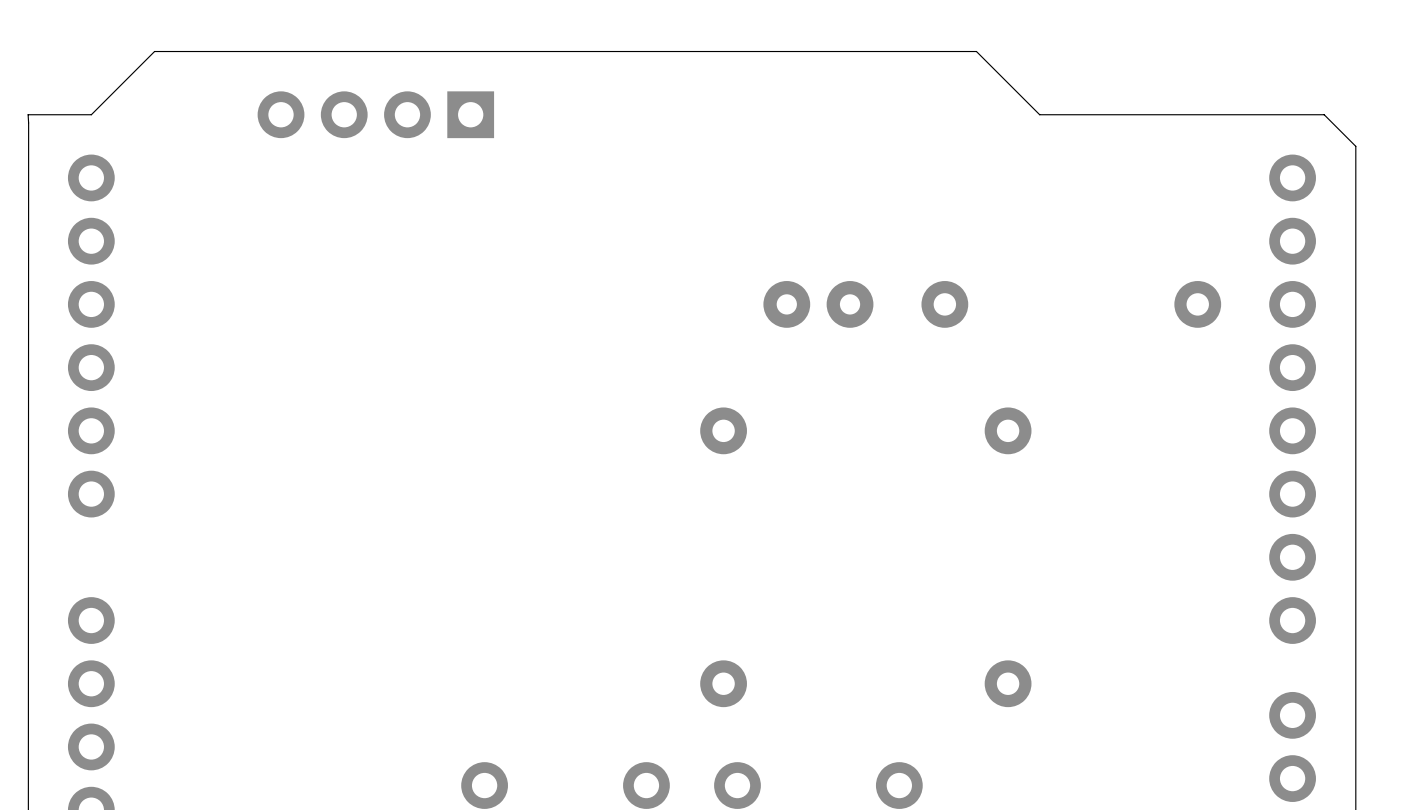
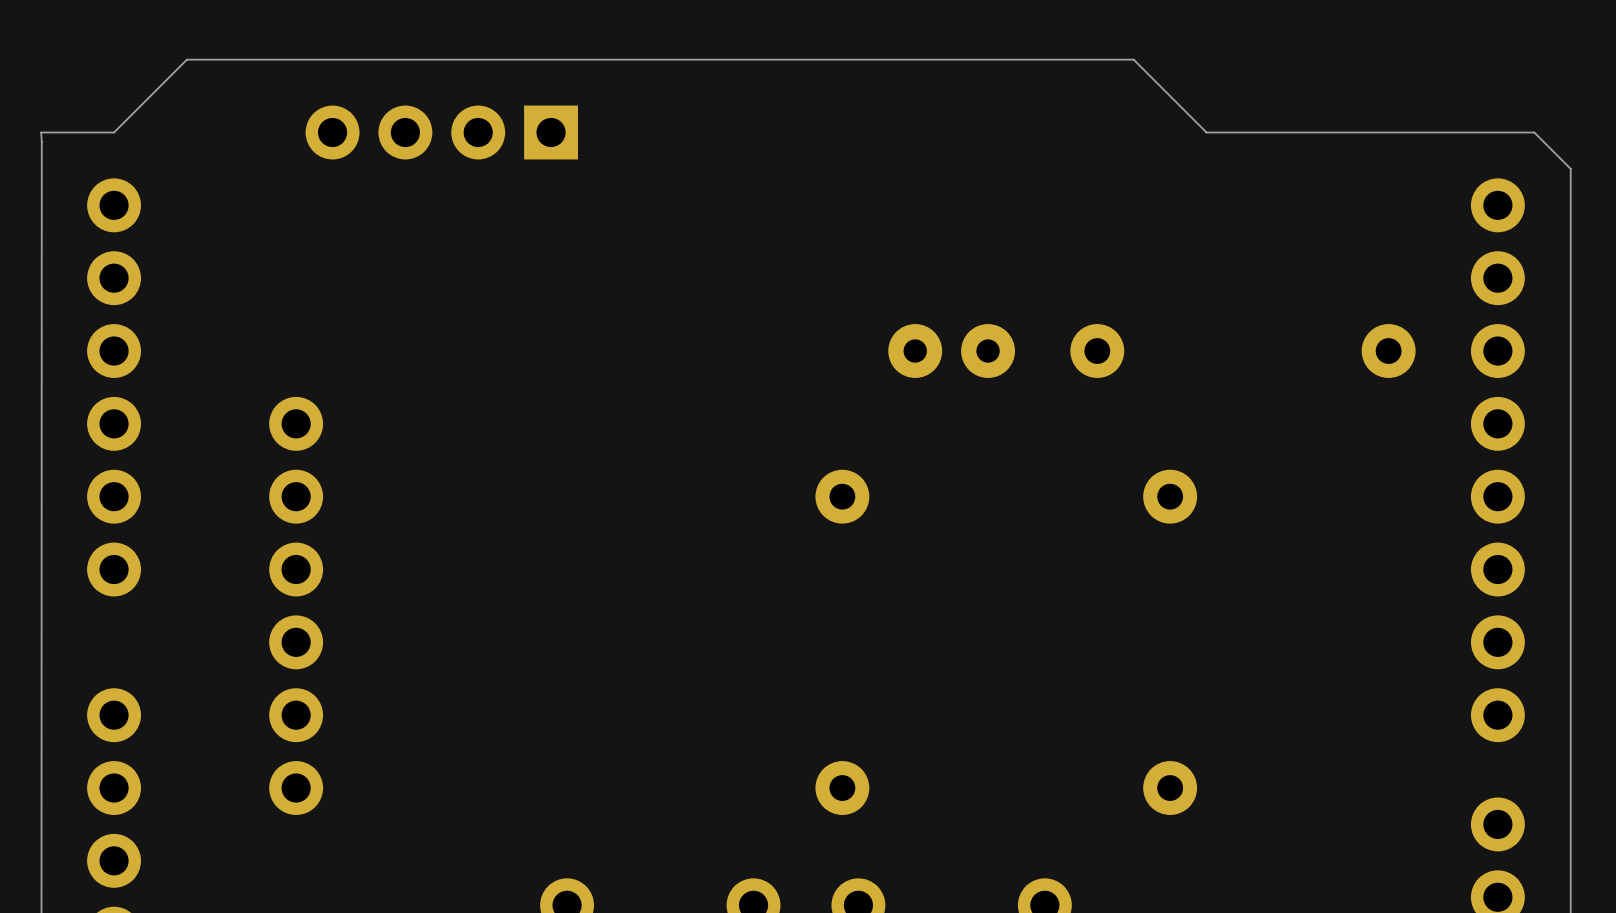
part: none -> (296, 605)

